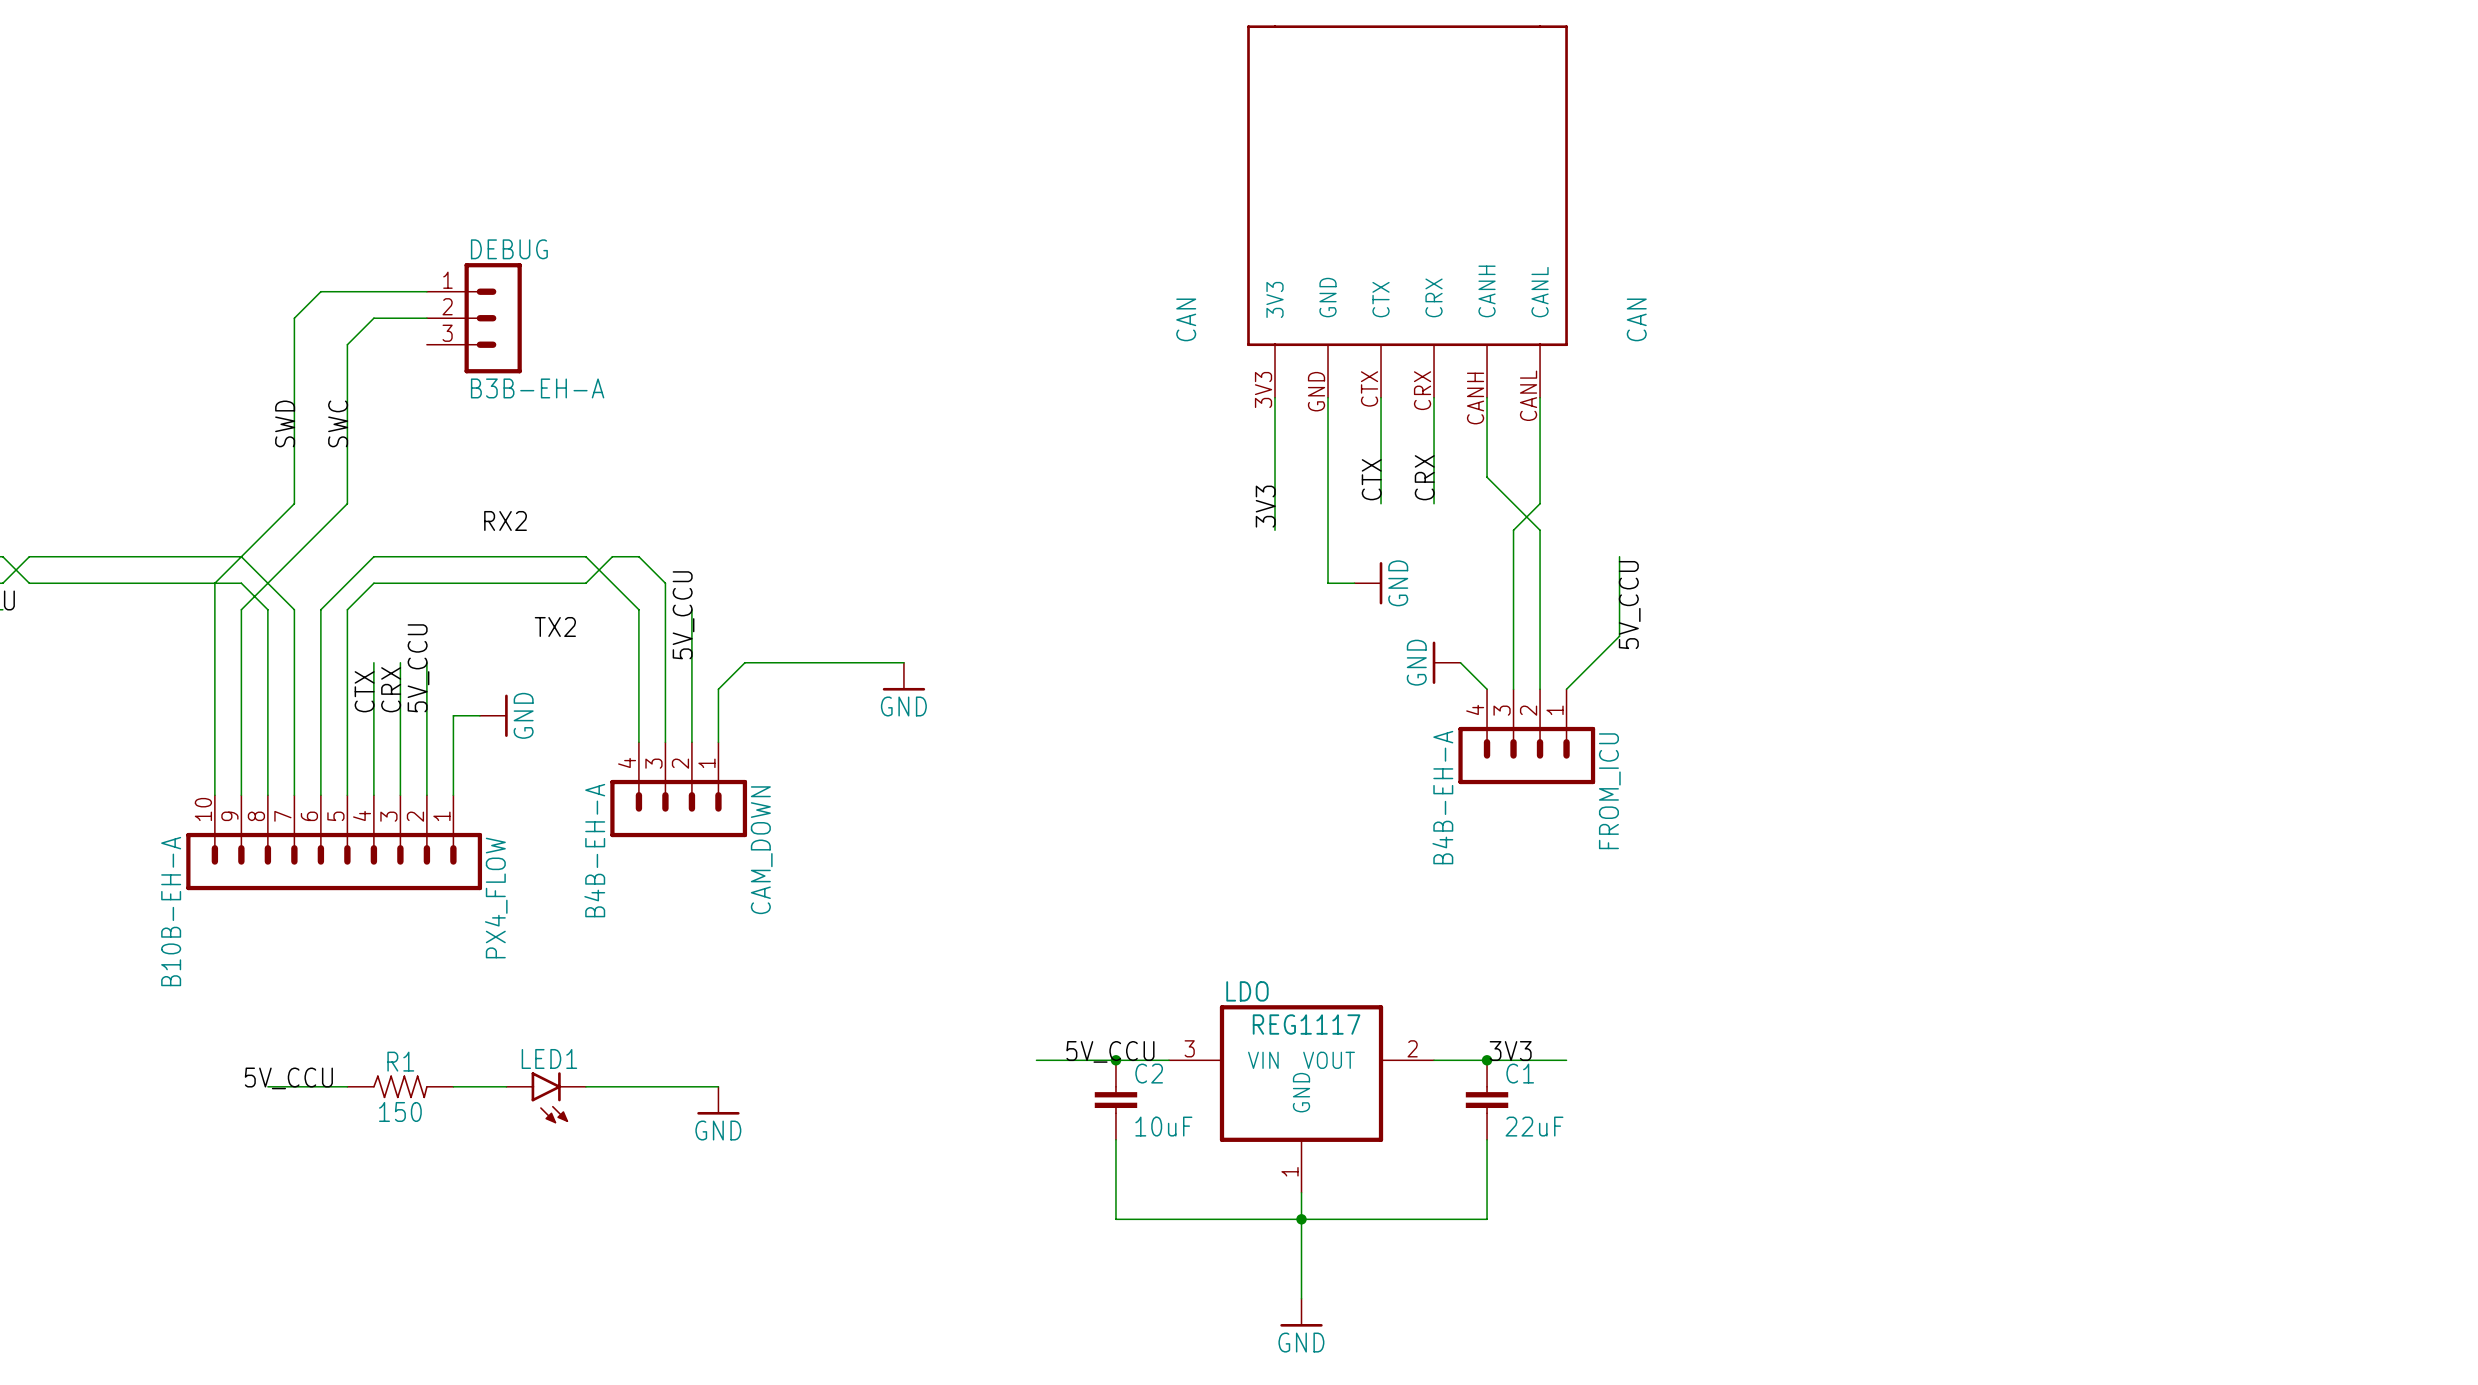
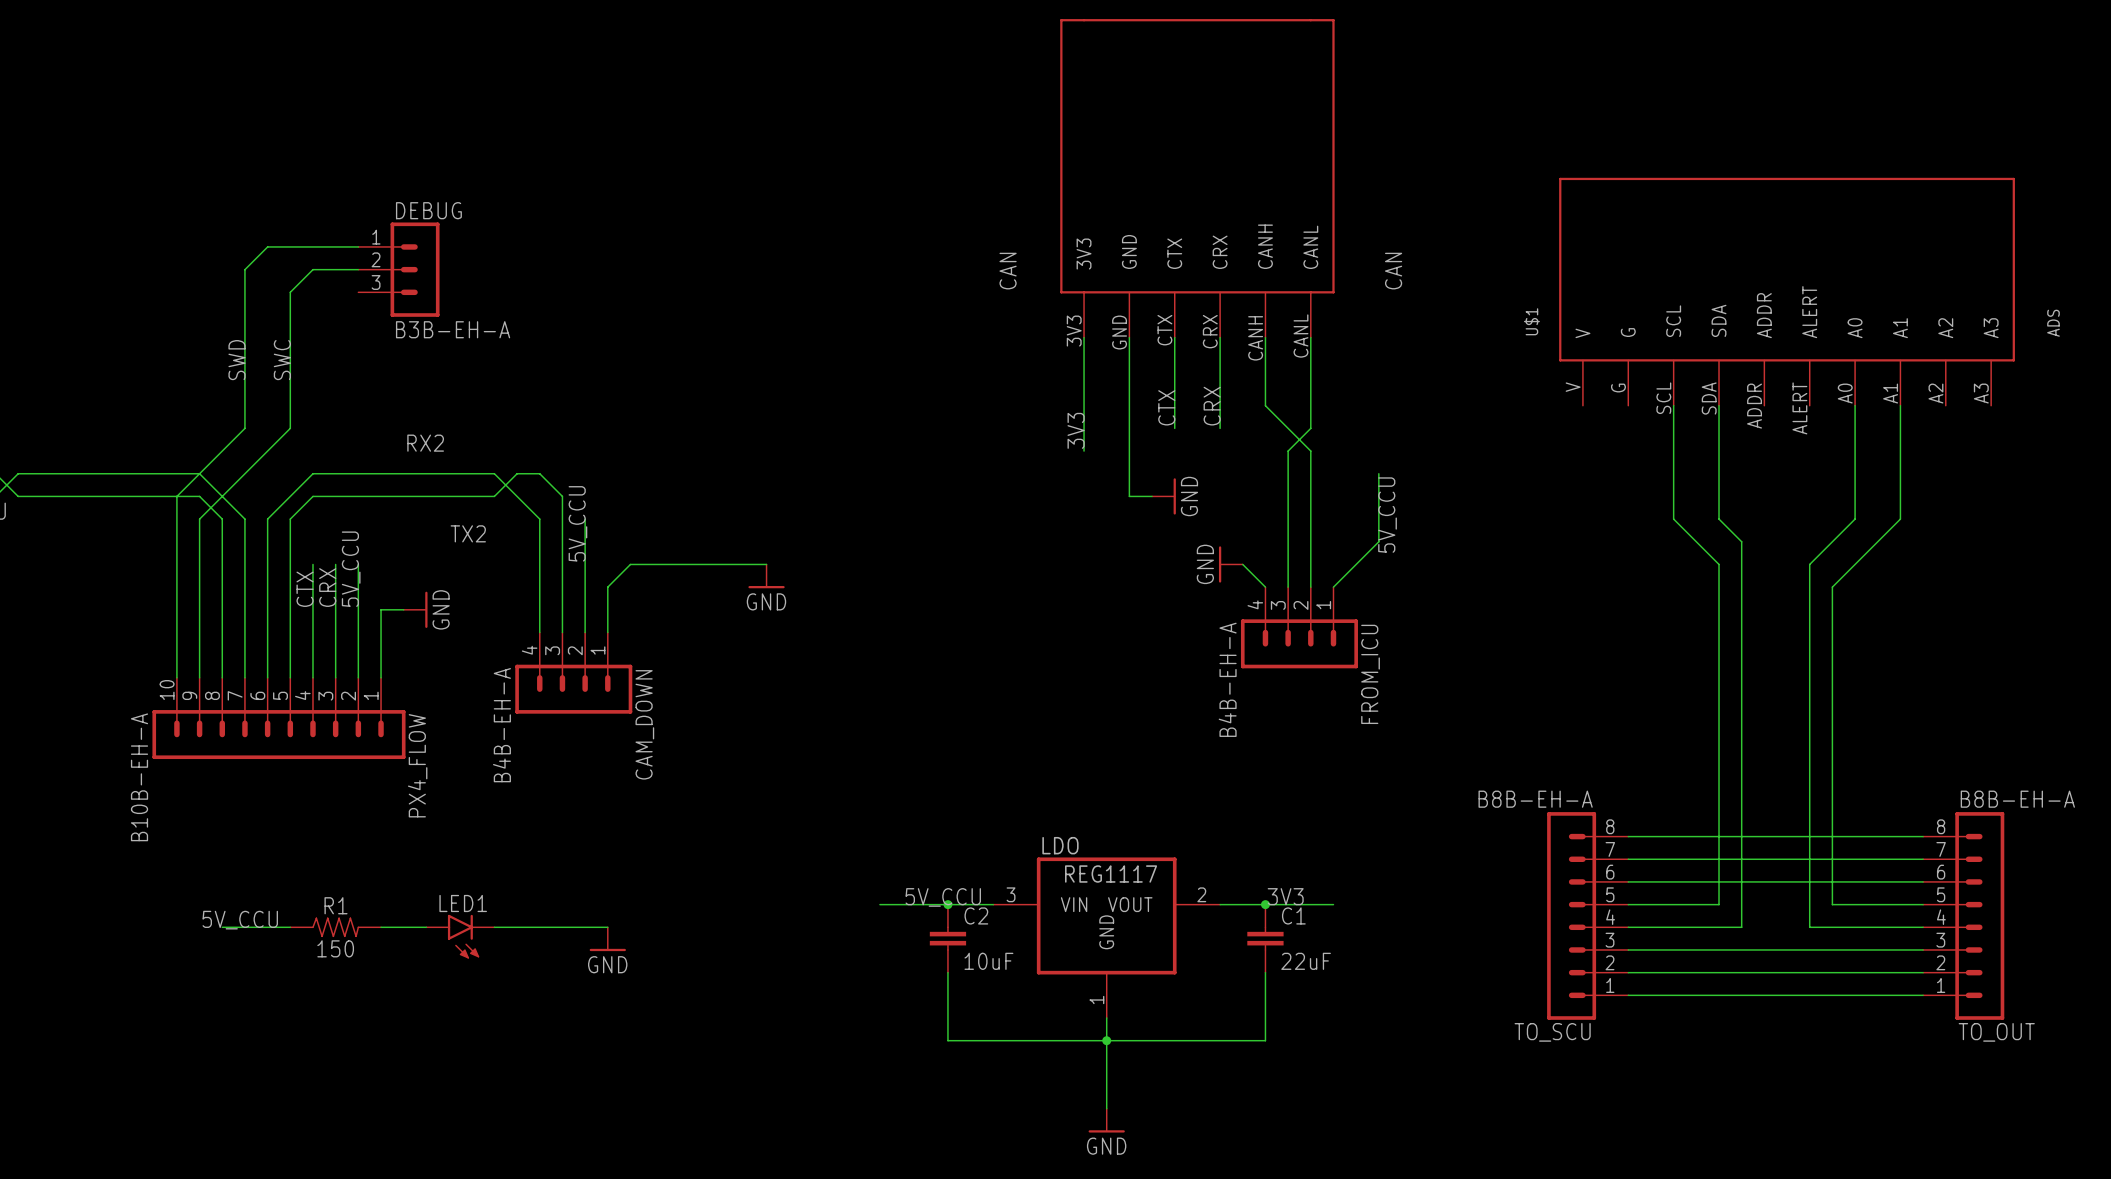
U$1: none -> ADS (1787, 291)
wire: none -> (1673, 405) (1673, 519) (1719, 564) (1719, 904) (1628, 904)
wire: none -> (1719, 405) (1719, 519) (1741, 541) (1741, 927) (1628, 927)
wire: none -> (1855, 405) (1855, 519) (1809, 564) (1809, 927) (1923, 927)
wire: none -> (1900, 405) (1900, 519) (1832, 587) (1832, 904) (1923, 904)
wire: none -> (1628, 836) (1923, 836)
wire: none -> (1628, 859) (1923, 859)
wire: none -> (1628, 881) (1923, 881)
TO_SCU: none -> B8B-EH-A (1587, 915)
TO_OUT: none -> B8B-EH-A (1963, 915)
wire: none -> (1628, 949) (1923, 949)
wire: none -> (1628, 972) (1923, 972)
wire: none -> (1628, 995) (1923, 995)

